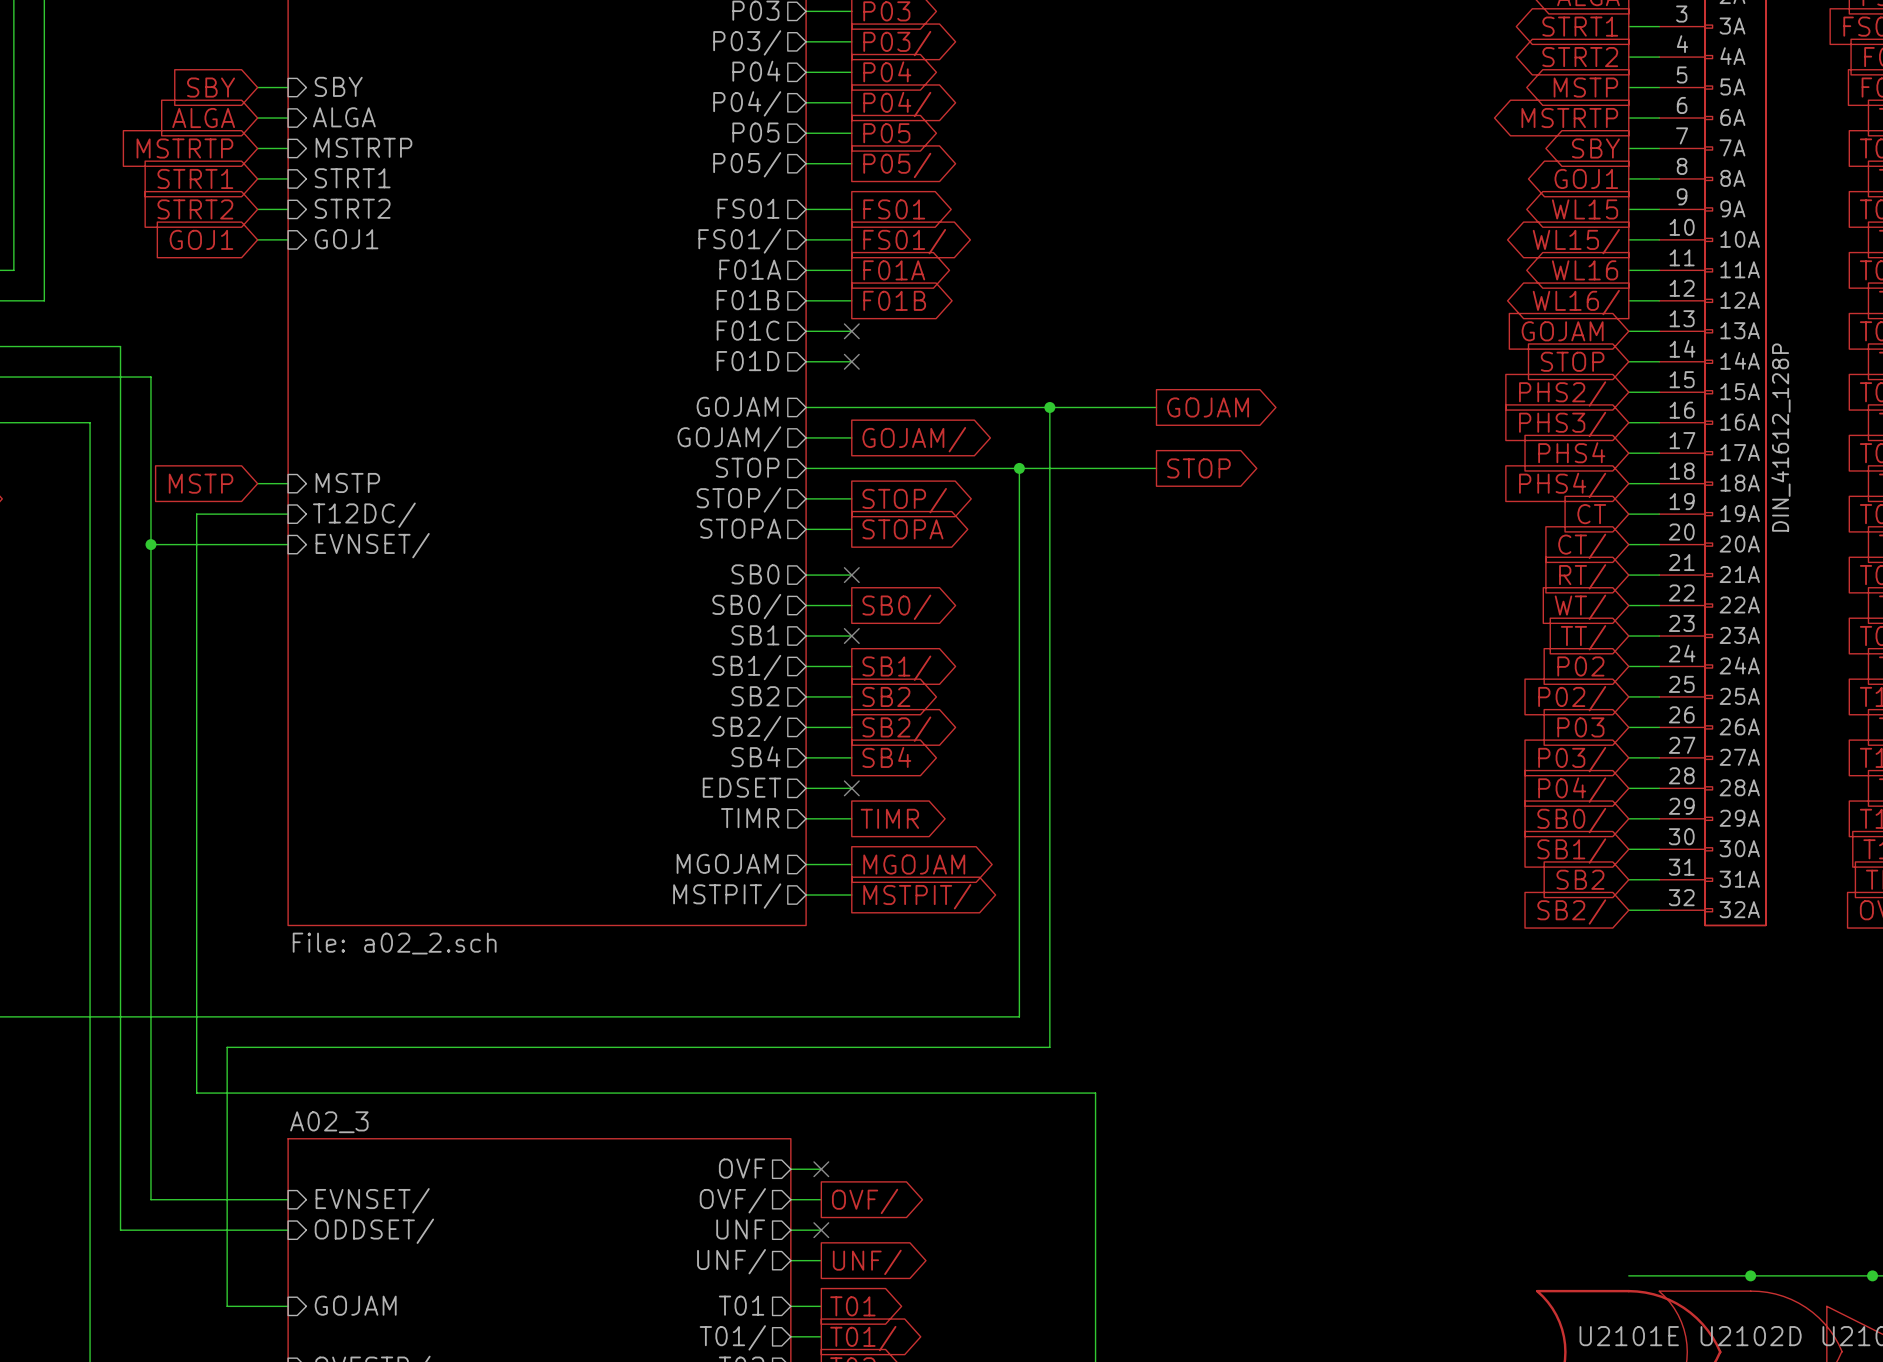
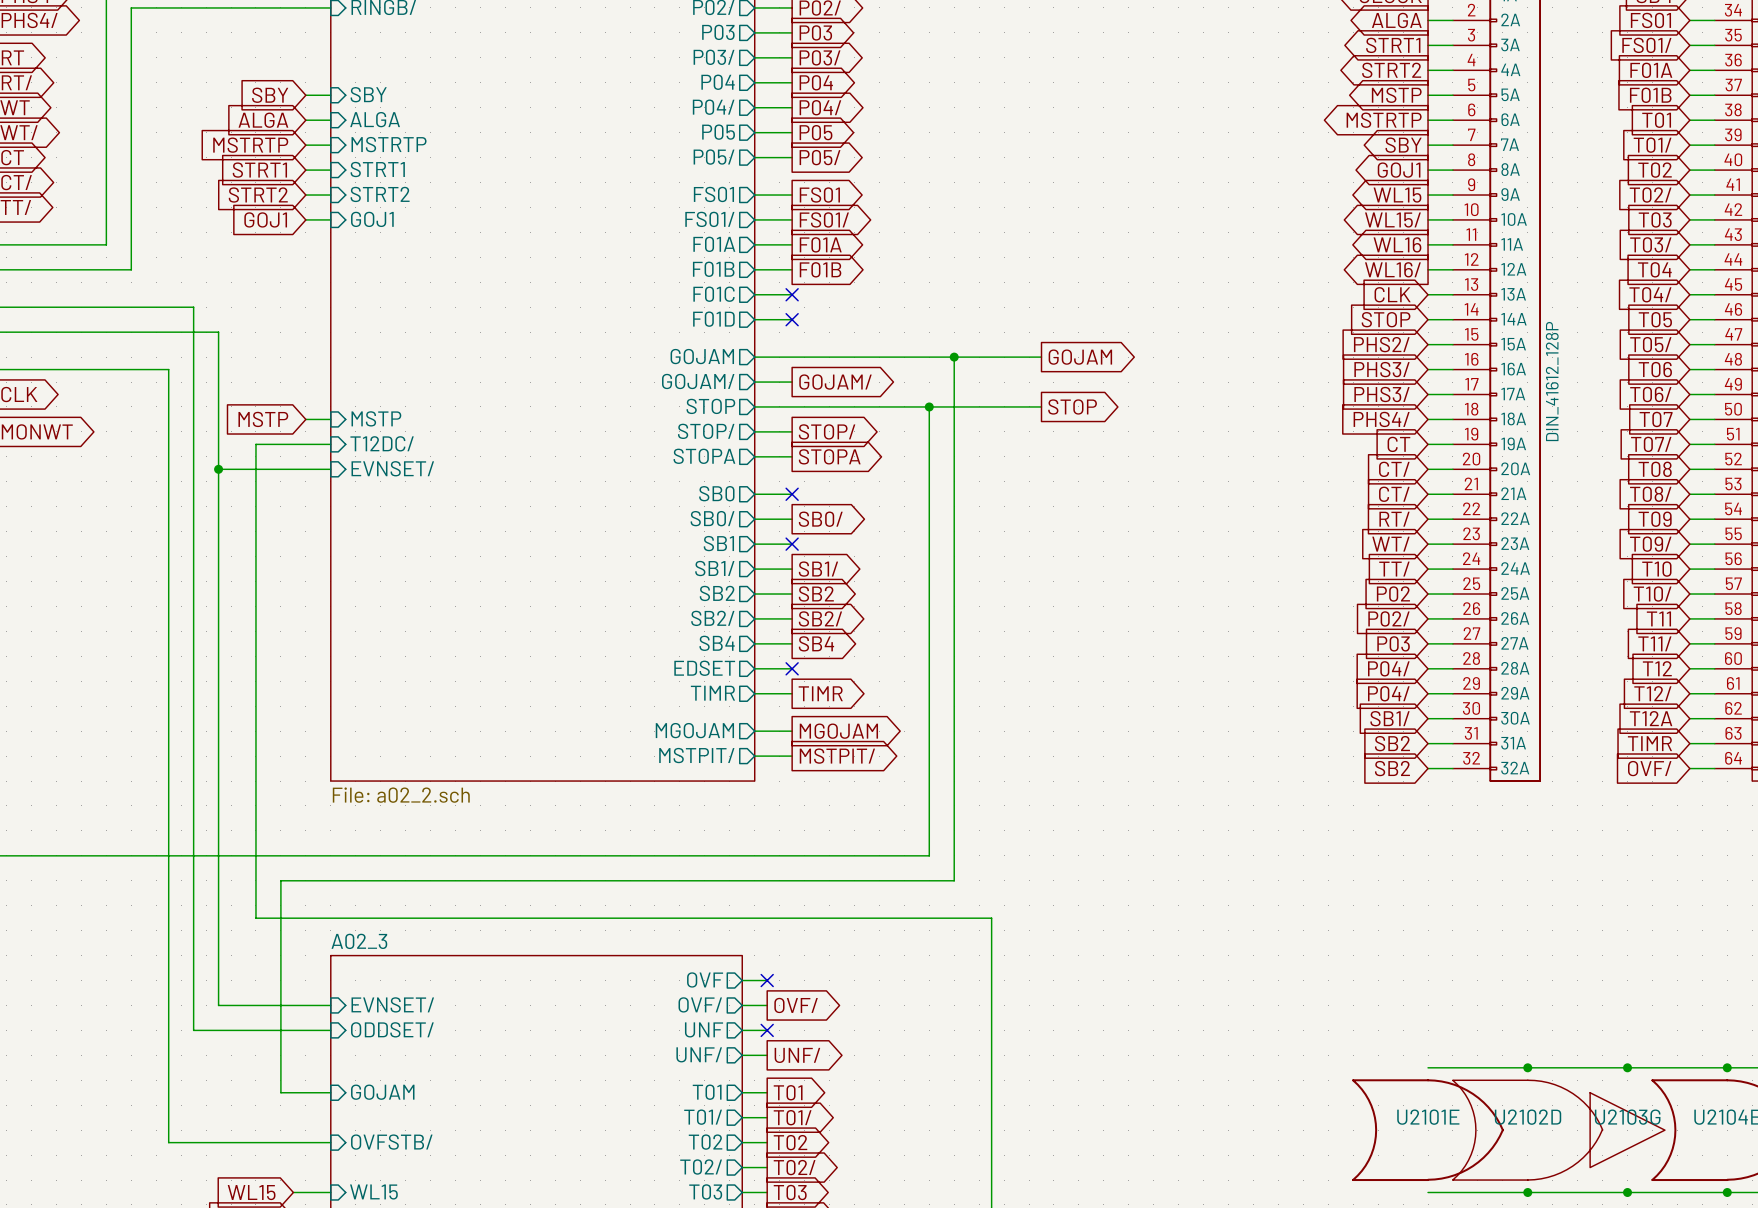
global label: GOJAM (1562, 331) -> CLK (1392, 294)
global label: PHS4 (1571, 452) -> PHS3/ (1382, 394)
global label: RT/ (1582, 576) -> CT/ (1394, 494)
global label: WT/ (1580, 607) -> RT/ (1394, 519)
global label: TT/ (1583, 637) -> WT/ (1390, 544)
global label: P02 (1580, 666) -> TT/ (1394, 569)
global label: P02/ (1572, 698) -> P02 (1393, 594)
global label: P03 (1580, 727) -> P02/ (1388, 618)
global label: P03/ (1572, 759) -> P03 (1393, 643)
global label: SB0/ (1571, 820) -> P04/ (1388, 693)
global label: SB2/ (1571, 911) -> SB2 (1392, 768)

